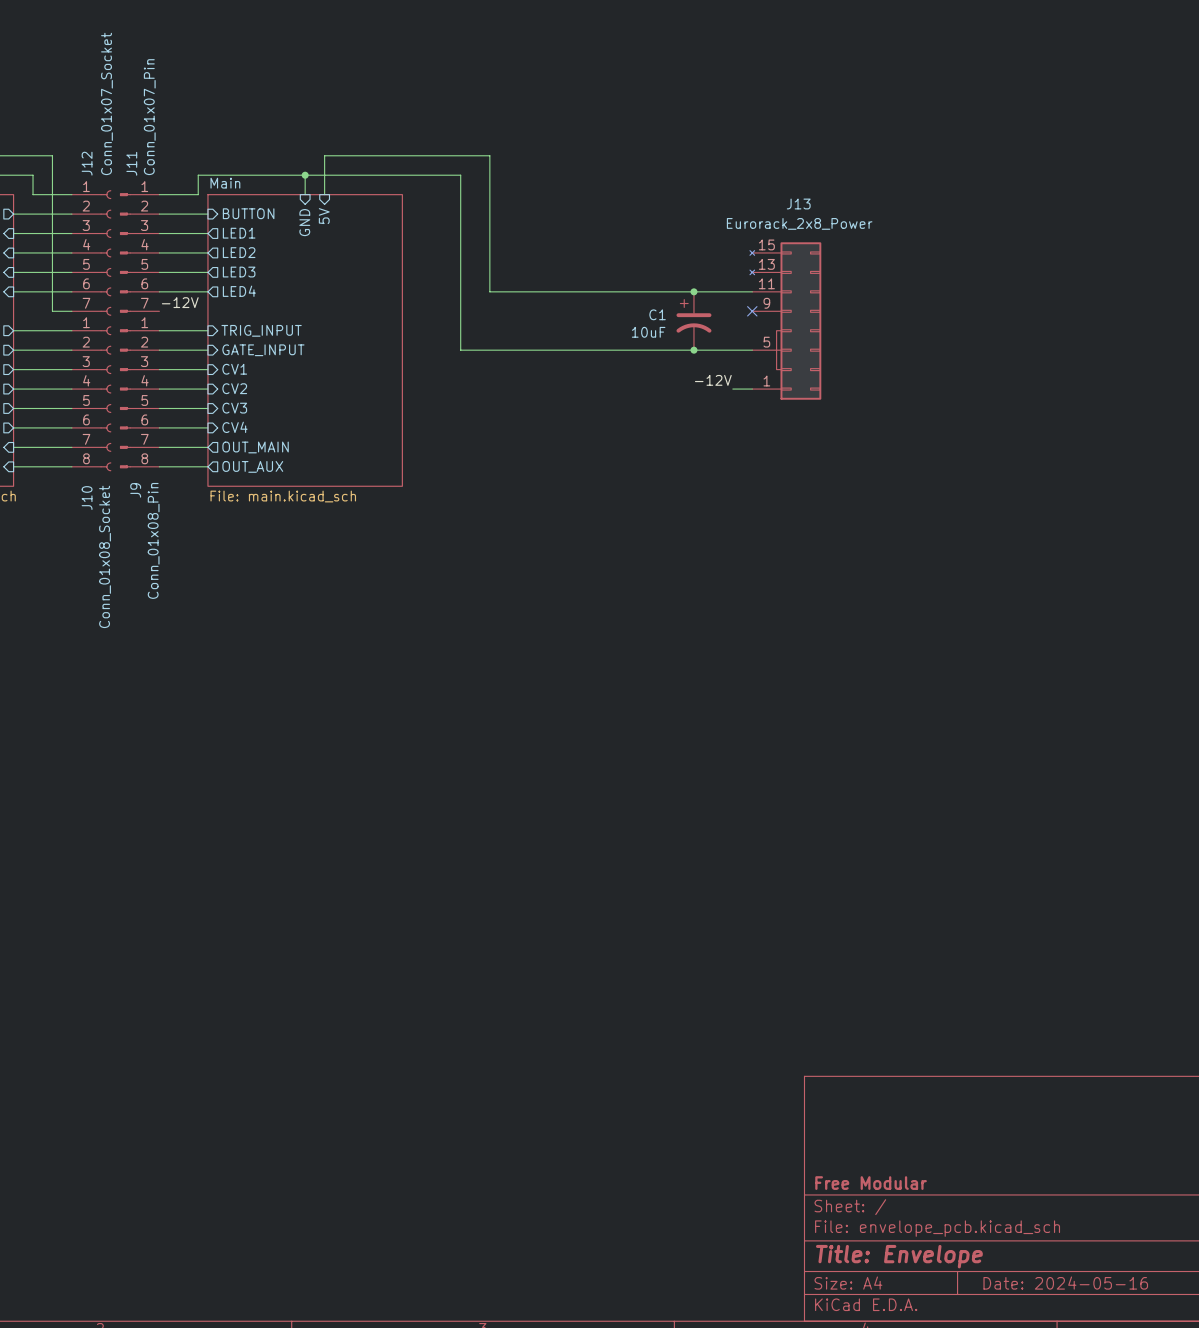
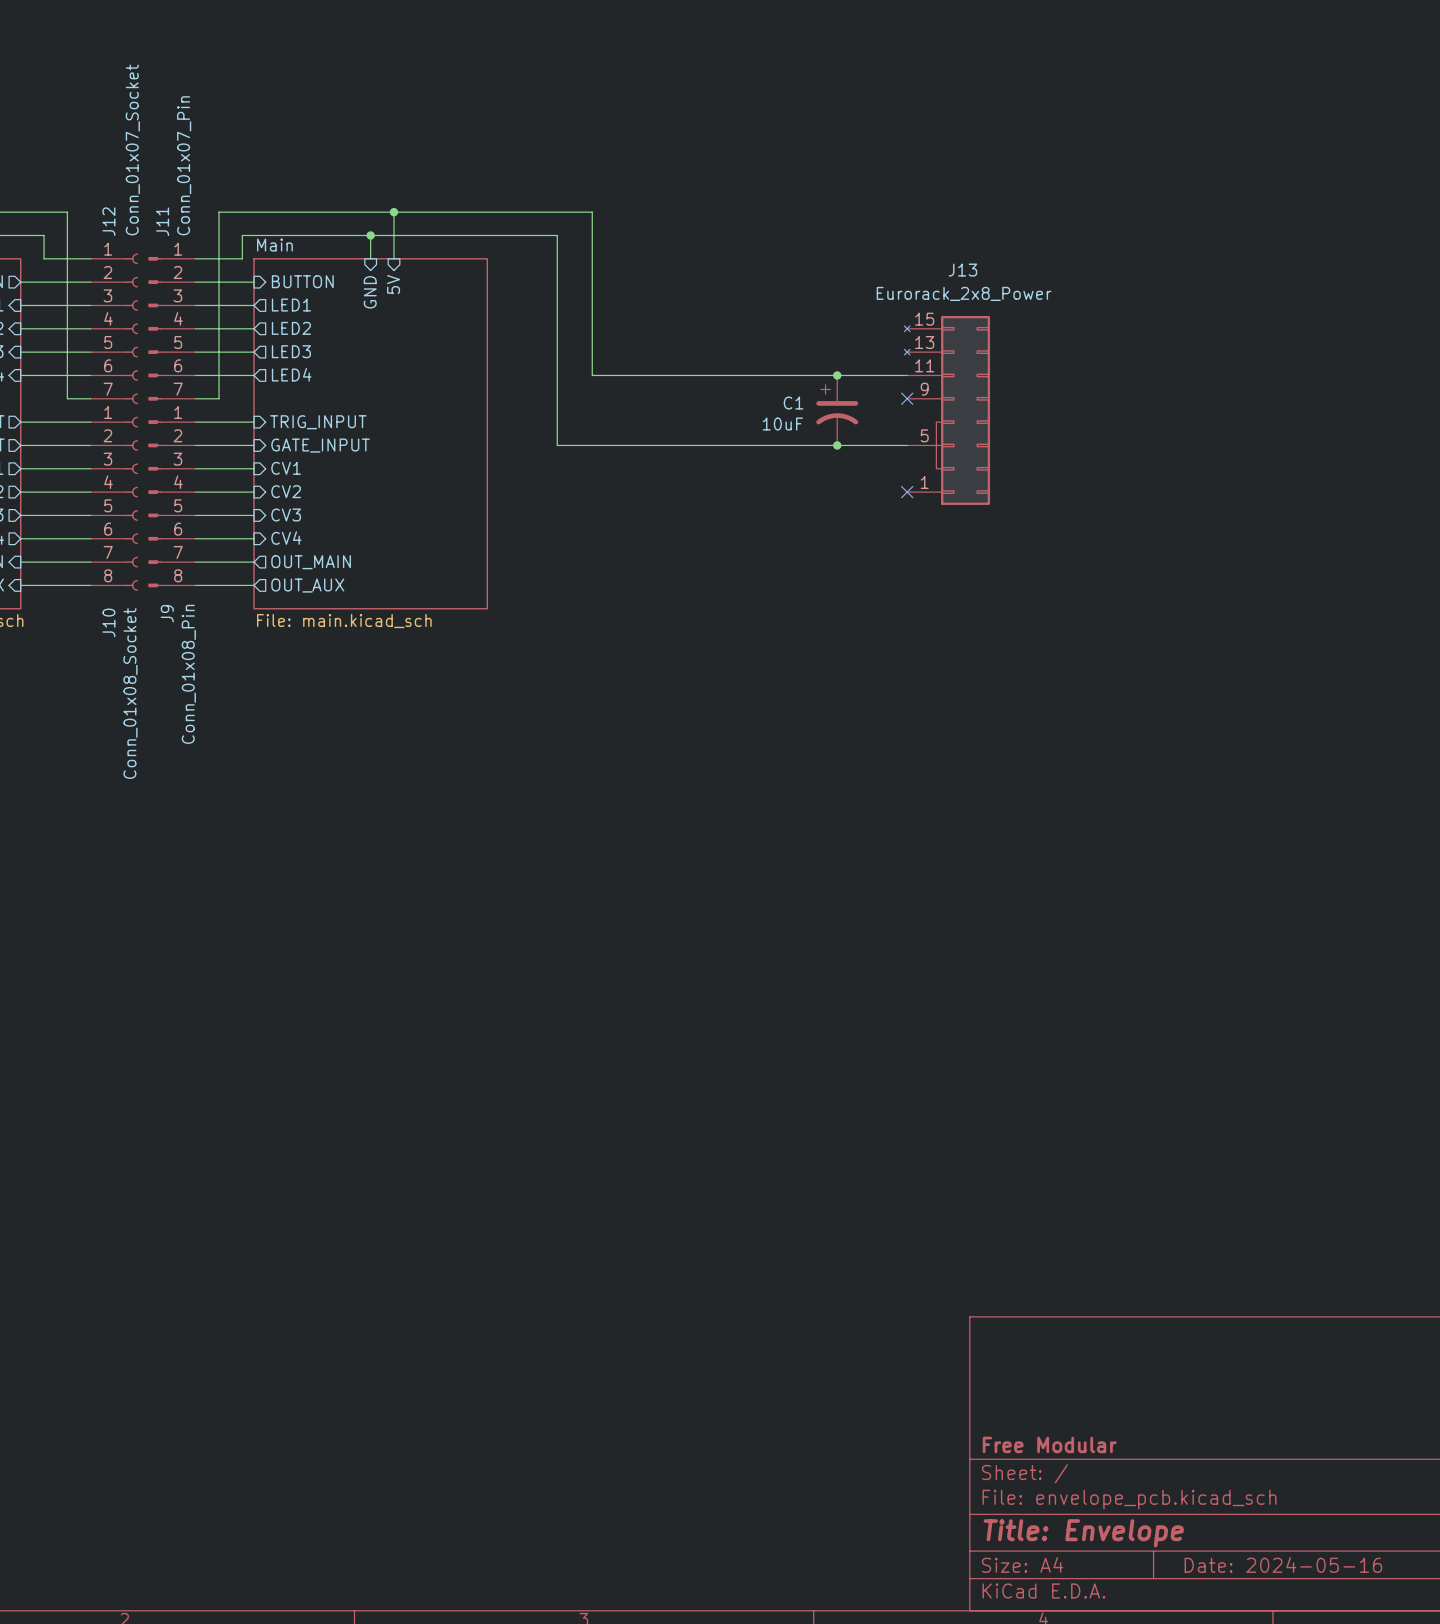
wire: none -> (393, 212) (219, 212) (219, 398) (195, 398)
junction: none -> (393, 212)
label: -12V (180, 302) -> none
label: -12V (713, 380) -> none
wire: (732, 389) (752, 389) -> none
no-connect mark: none -> (907, 492)

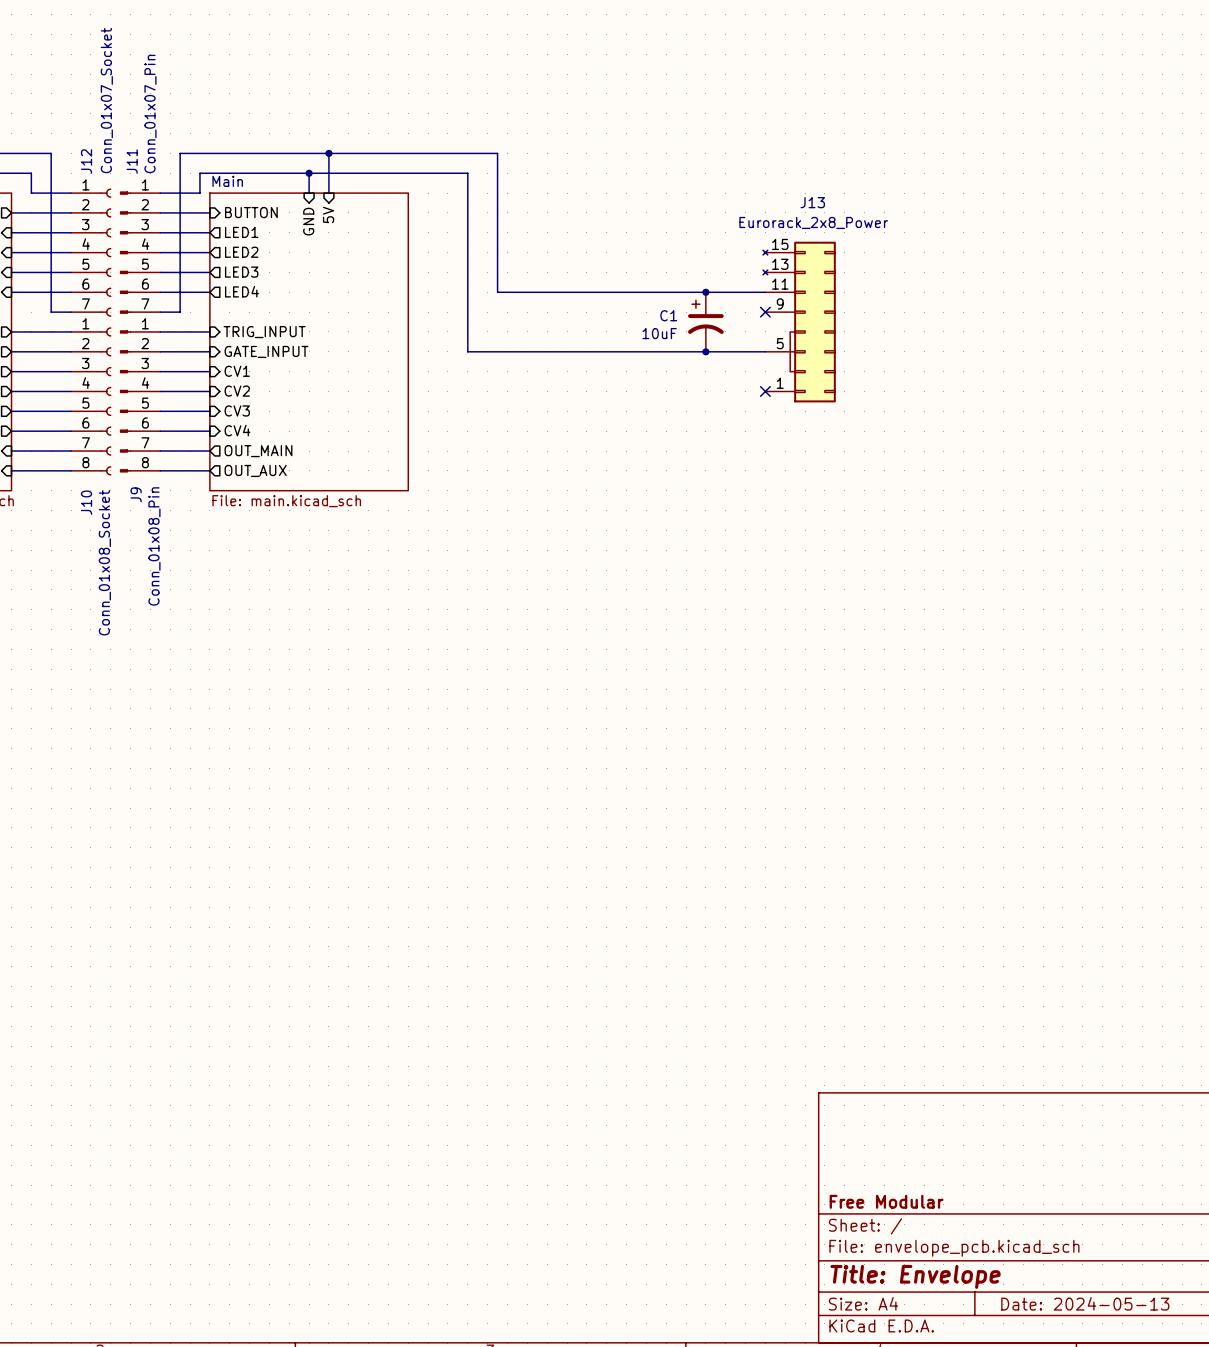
title block: Date: 2024-05-16 (1283, 1564) -> Date: 2024-05-13 (1085, 1303)

